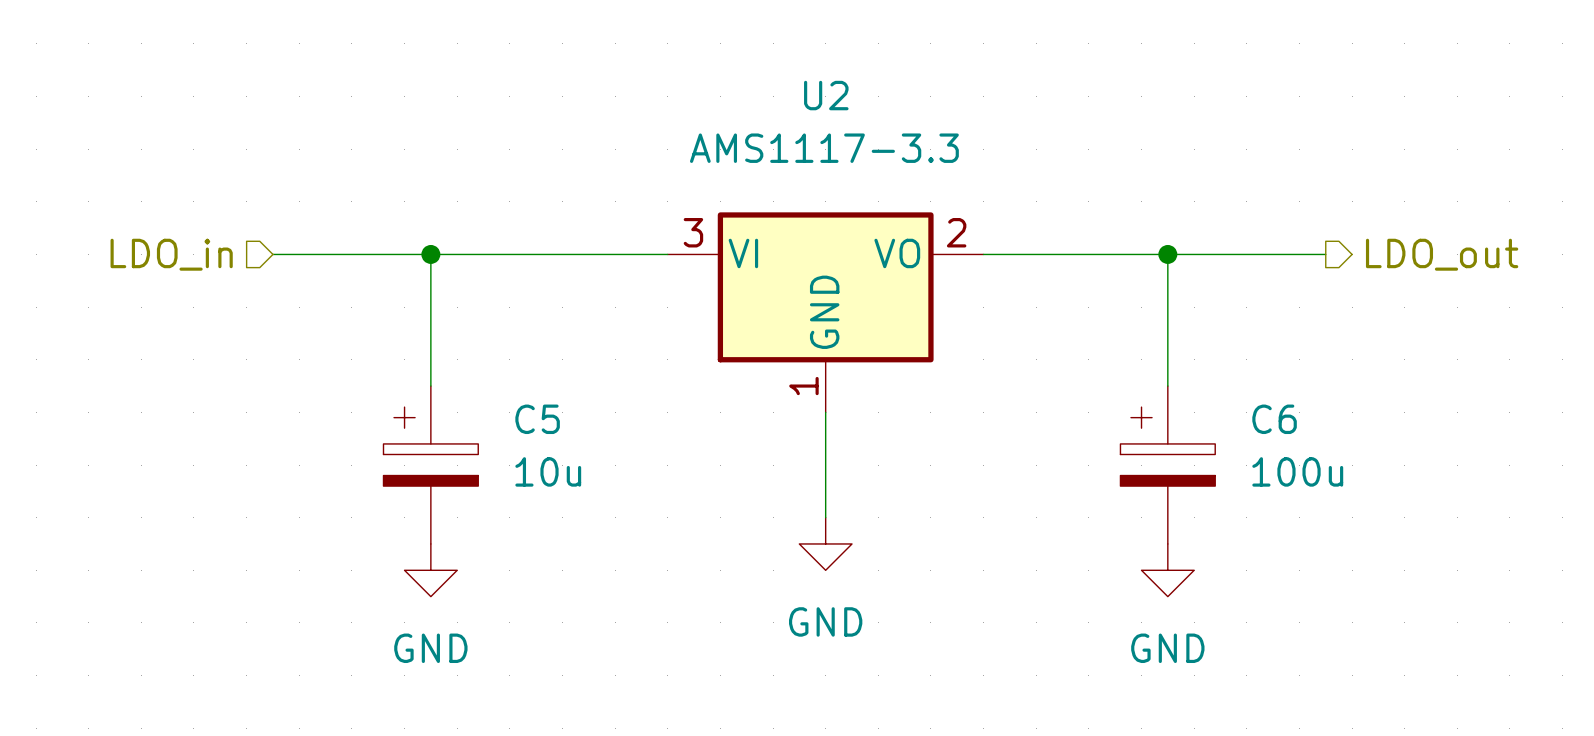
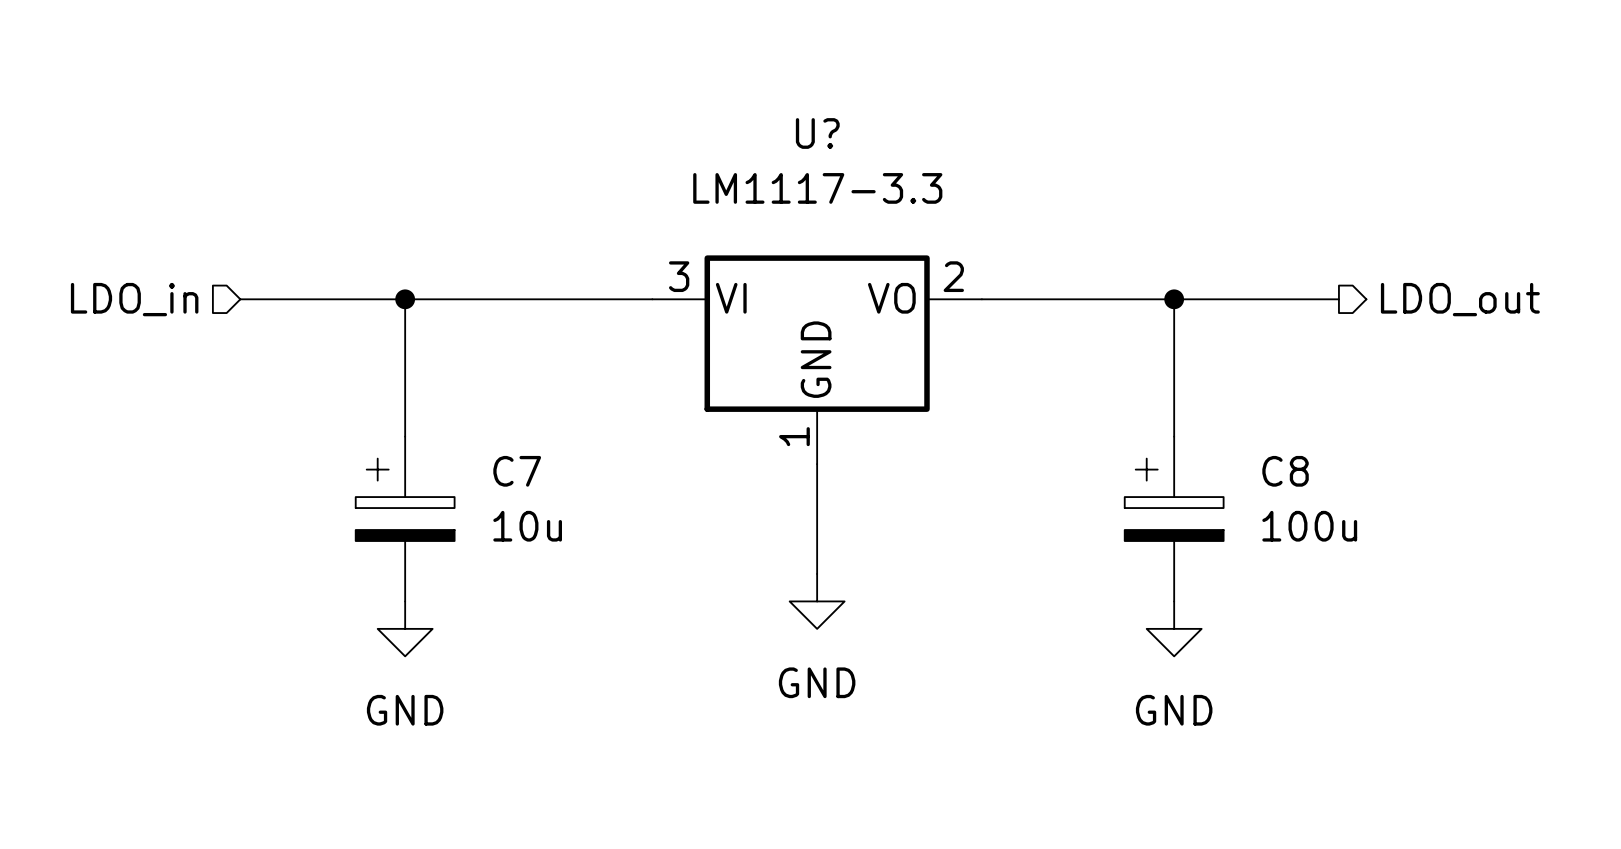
U2 name: U2 (826, 95) -> U? (817, 133)
U2 value: AMS1117-3.3 (824, 148) -> LM1117-3.3 (817, 188)
C5 name: C5 (537, 419) -> C7 (517, 471)
C6 name: C6 (1274, 419) -> C8 (1285, 471)

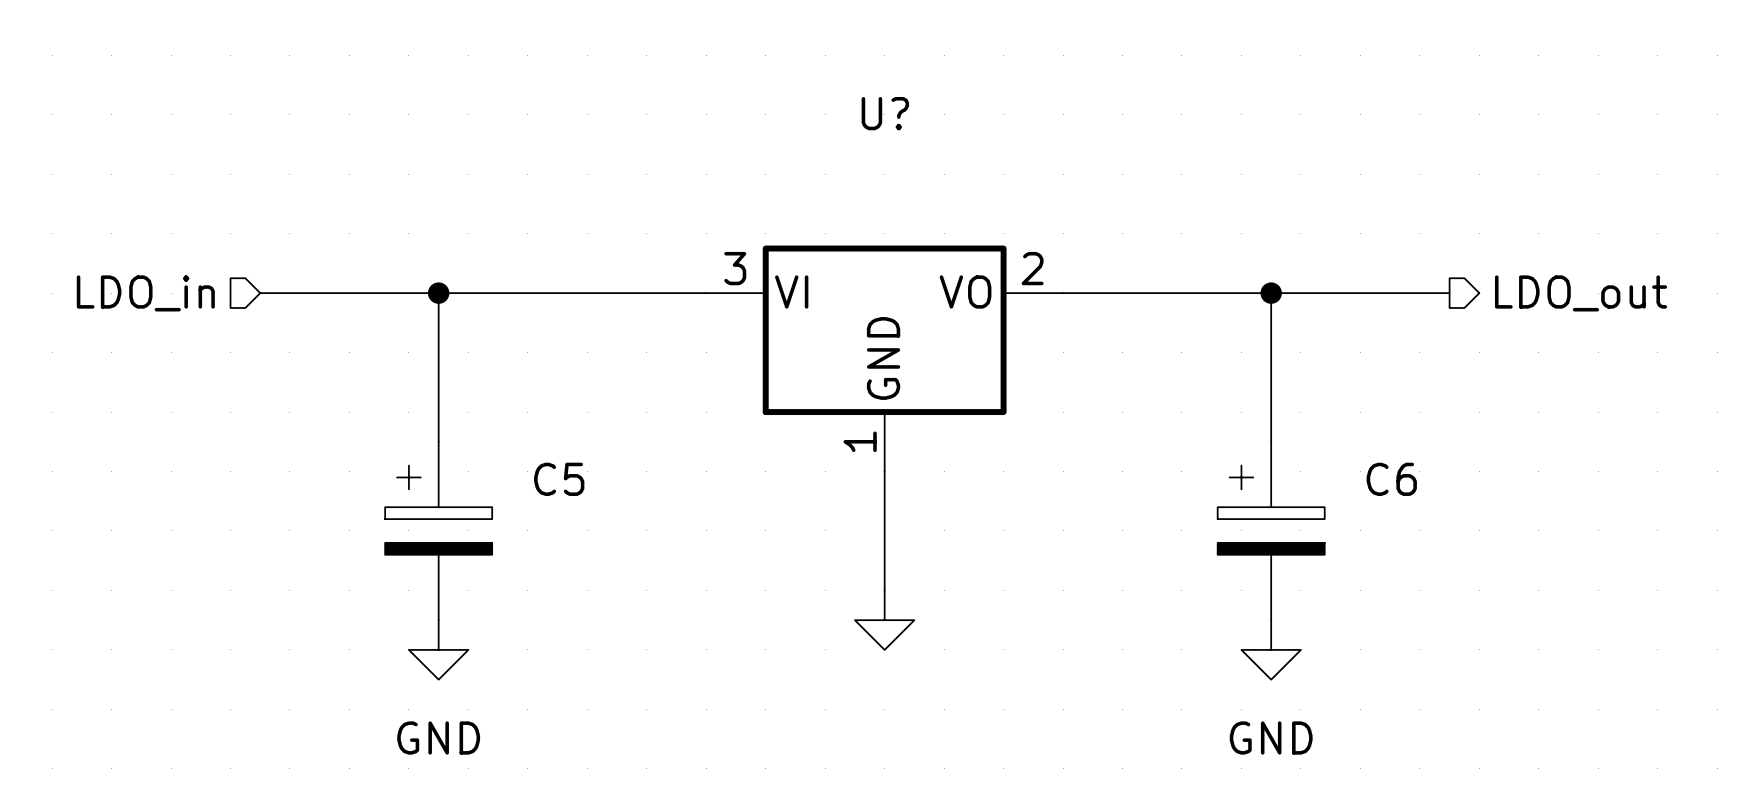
U? value: LM1117-3.3 (817, 188) -> none
C7 name: C7 (517, 471) -> C5 (559, 479)
C8 name: C8 (1285, 471) -> C6 (1391, 479)
C7 value: 10u (527, 526) -> none
C8 value: 100u (1309, 526) -> none
power symbol text: GND (817, 682) -> none

